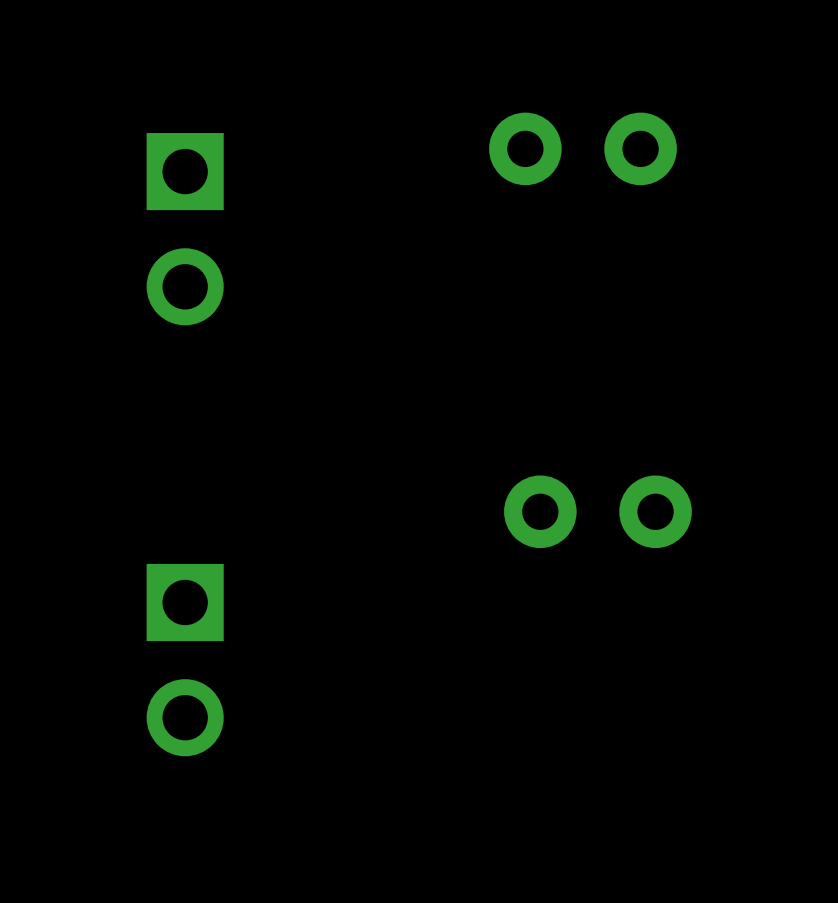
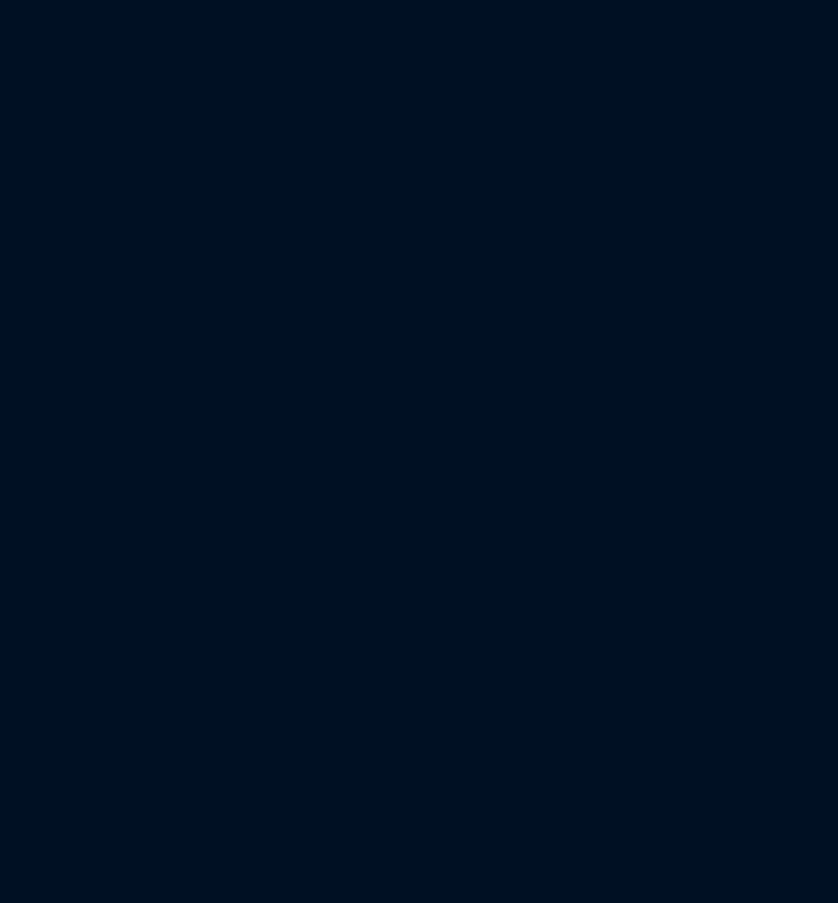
part: (582, 148) -> none
part: (185, 229) -> none
part: (597, 511) -> none
part: (185, 660) -> none

